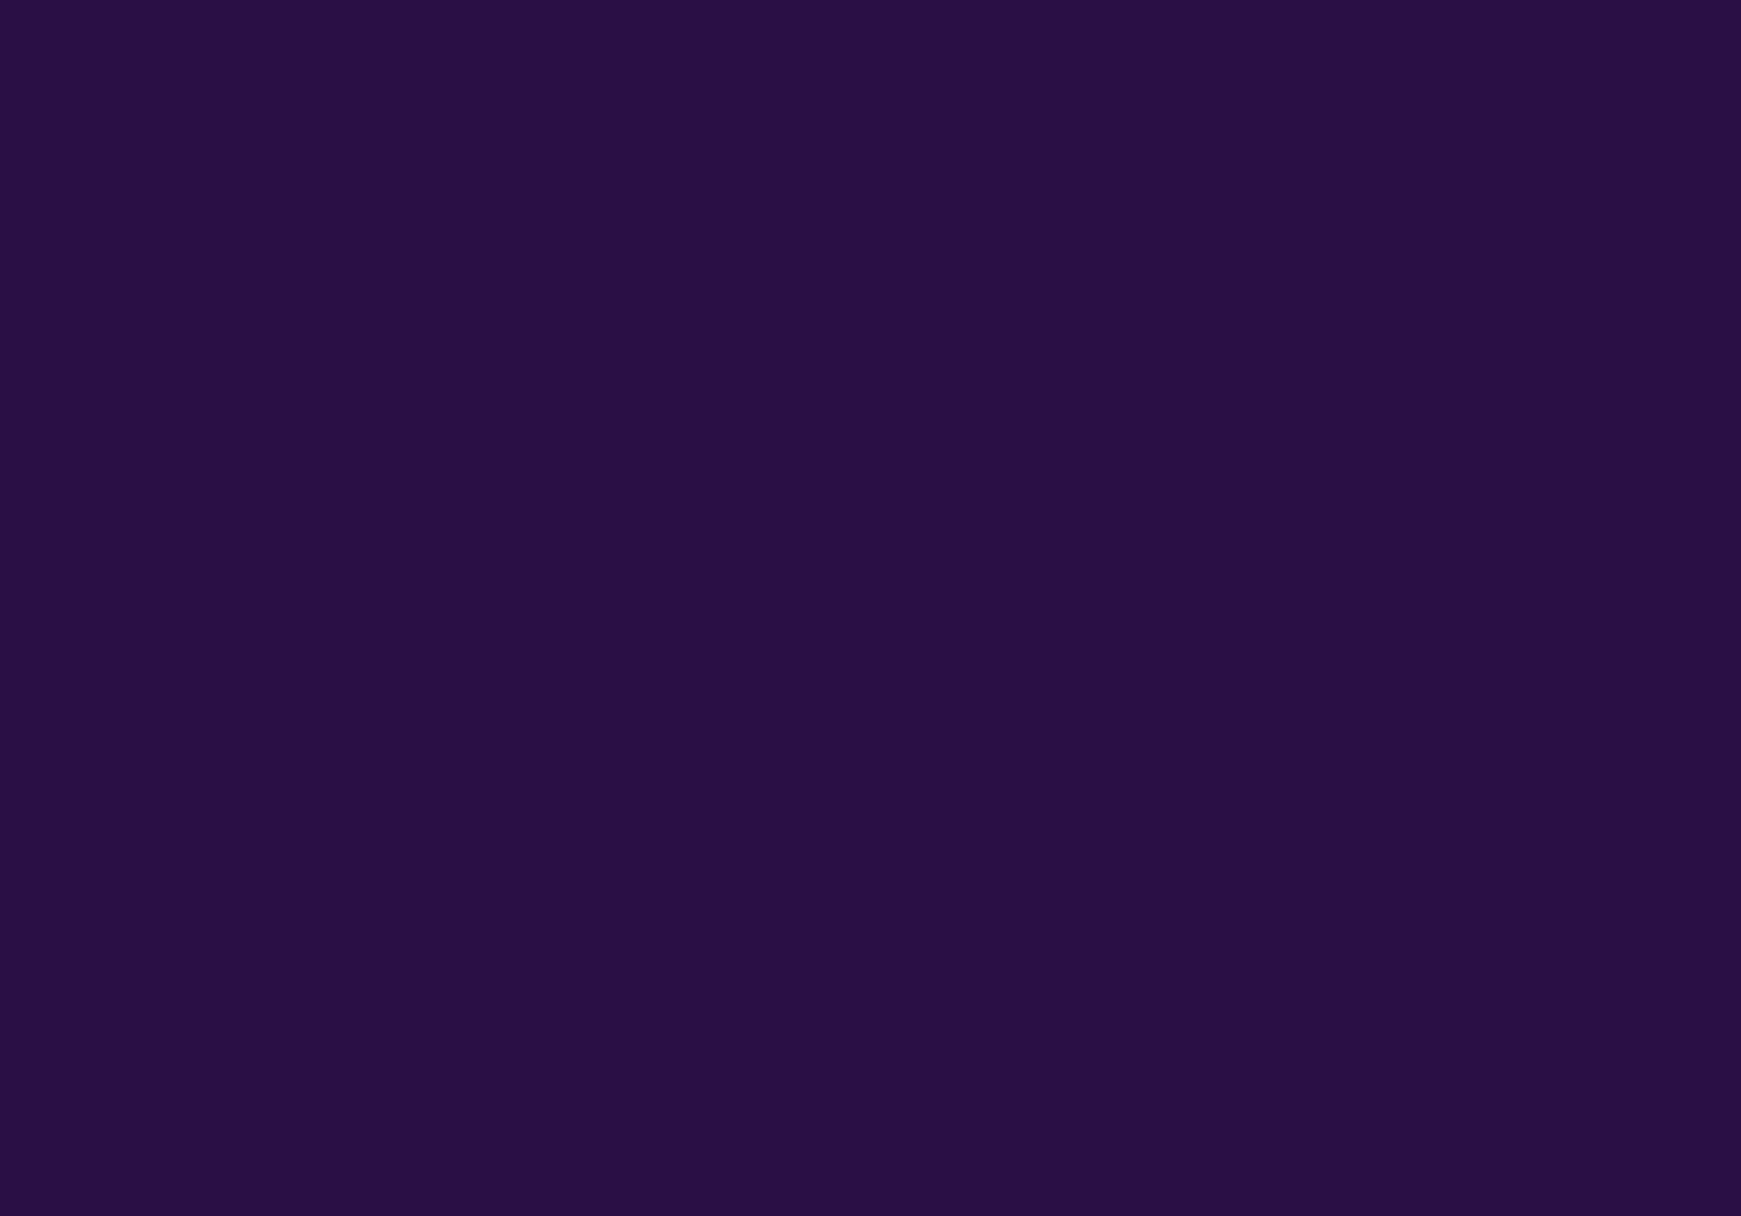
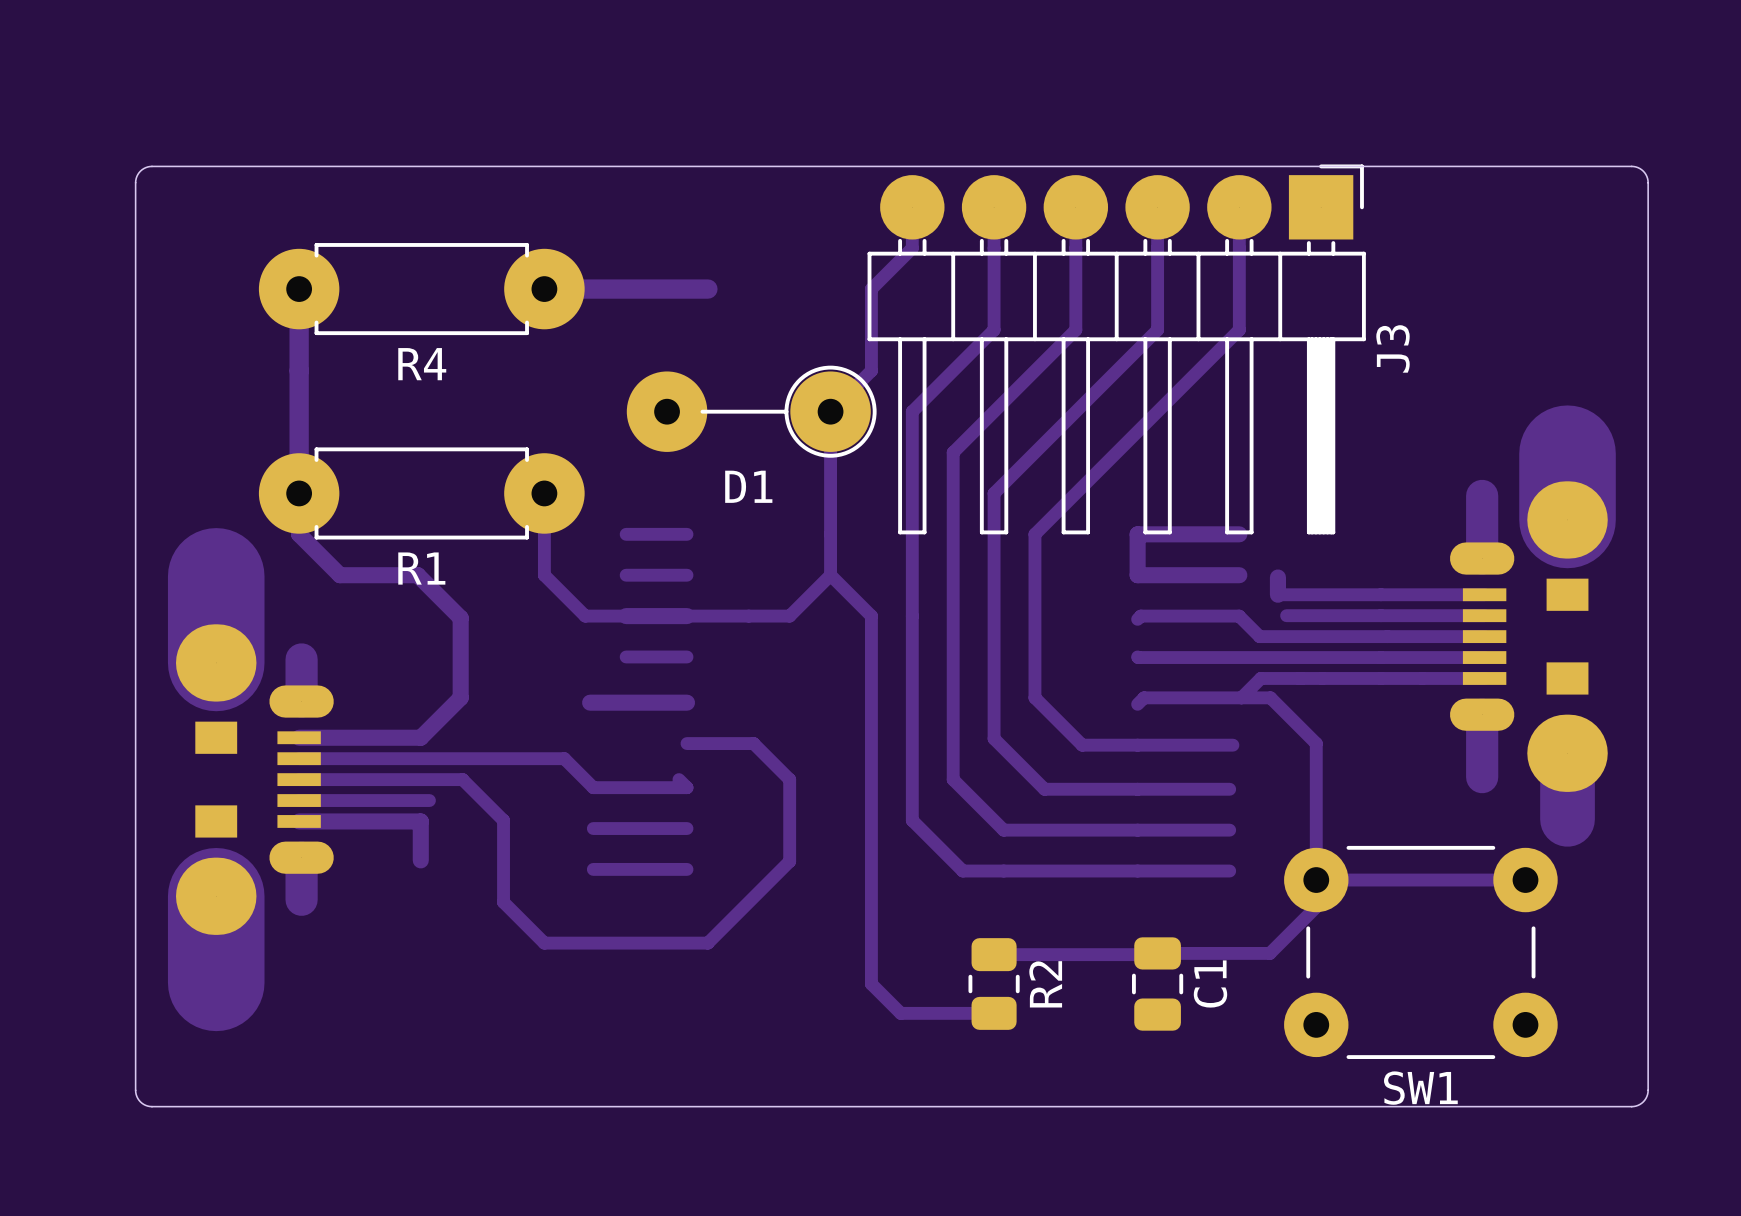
board edge: none -> (151, 166) (1631, 166) (1639, 168) (1645, 174) (1648, 182) (1648, 1090) (1645, 1098) (1639, 1104) (1631, 1106) (151, 1106) (143, 1104) (137, 1098) (135, 1090) (135, 182) (140, 171) (151, 166)
track: none -> (912, 207) (912, 248) (871, 289) (871, 370) (830, 411) (830, 575)
track: none -> (994, 207) (994, 329) (912, 411) (912, 820) (962, 871) (1229, 871)
track: none -> (1075, 207) (1075, 329) (953, 452) (953, 779) (1003, 830) (1229, 830)
track: none -> (1157, 207) (1157, 329) (994, 493) (994, 738) (1044, 789) (1229, 789)
track: none -> (1239, 207) (1239, 329) (1034, 534) (1034, 697) (1082, 745) (1232, 745)
track: none -> (299, 289) (299, 534) (340, 575) (417, 575) (460, 618) (460, 697) (420, 737) (299, 737)
R4: none -> (421, 289)
track: none -> (544, 289) (707, 289)
J3: none -> (1116, 349)
D1: none -> (751, 411)
track: none -> (1567, 453) (1567, 519)
R1: none -> (421, 493)
track: none -> (544, 493) (544, 575) (585, 616) (789, 616) (830, 575)
track: none -> (1482, 495) (1482, 558)
track: none -> (626, 534) (687, 534)
track: none -> (1239, 534) (1137, 534) (1137, 575) (1239, 575)
track: none -> (626, 575) (687, 575)
track: none -> (830, 575) (871, 616) (871, 984) (900, 1013) (994, 1013)
track: none -> (216, 576) (216, 662)
track: none -> (1277, 577) (1277, 594) (1484, 594)
track: none -> (1286, 615) (1484, 615)
track: none -> (1137, 619) (1140, 616) (1239, 616) (1259, 636) (1484, 636)
part: none -> (1528, 636)
track: none -> (626, 656) (687, 656)
track: none -> (1137, 656) (1484, 657)
track: none -> (301, 659) (301, 701)
track: none -> (1484, 678) (1260, 678) (1241, 697)
track: none -> (590, 702) (687, 702)
track: none -> (1137, 704) (1144, 697) (1270, 697) (1316, 743) (1316, 907) (1269, 953) (994, 954)
track: none -> (1482, 714) (1482, 777)
track: none -> (687, 743) (753, 743) (789, 779) (789, 861) (707, 943) (544, 943) (503, 902) (503, 820) (462, 779) (299, 779)
track: none -> (299, 758) (564, 758) (593, 787) (687, 787) (678, 779)
part: none -> (254, 779)
track: none -> (1567, 780) (1567, 753) (1567, 819)
track: none -> (299, 800) (429, 800)
track: none -> (299, 821) (420, 821) (420, 860)
track: none -> (593, 828) (687, 828)
track: none -> (301, 857) (301, 899)
track: none -> (593, 869) (687, 869)
track: none -> (1316, 880) (1525, 880)
track: none -> (216, 896) (216, 982)
SW1: none -> (1420, 952)
R2: none -> (994, 984)
C1: none -> (1157, 984)

